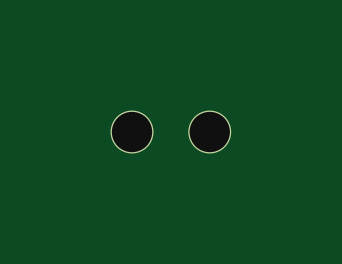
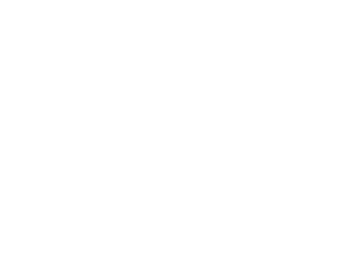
part: (132, 132) -> none
part: (209, 132) -> none

